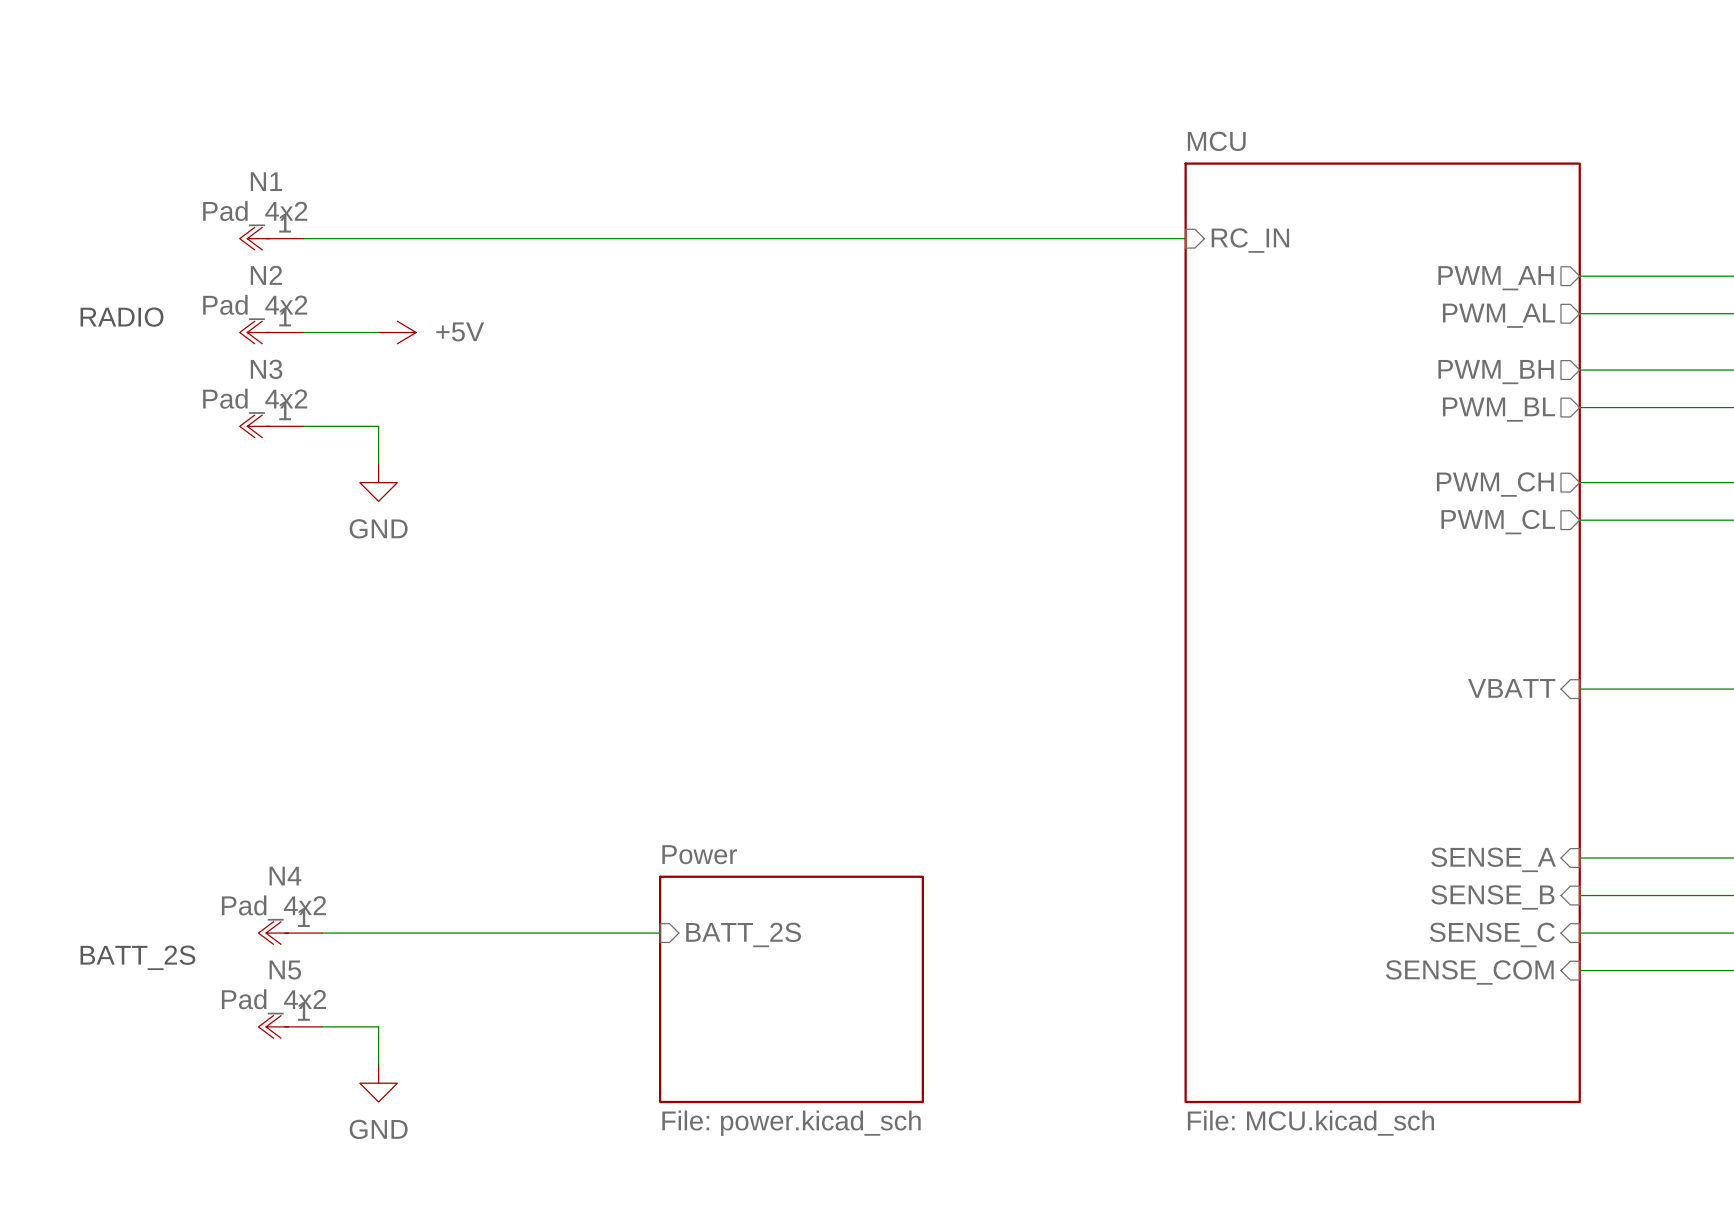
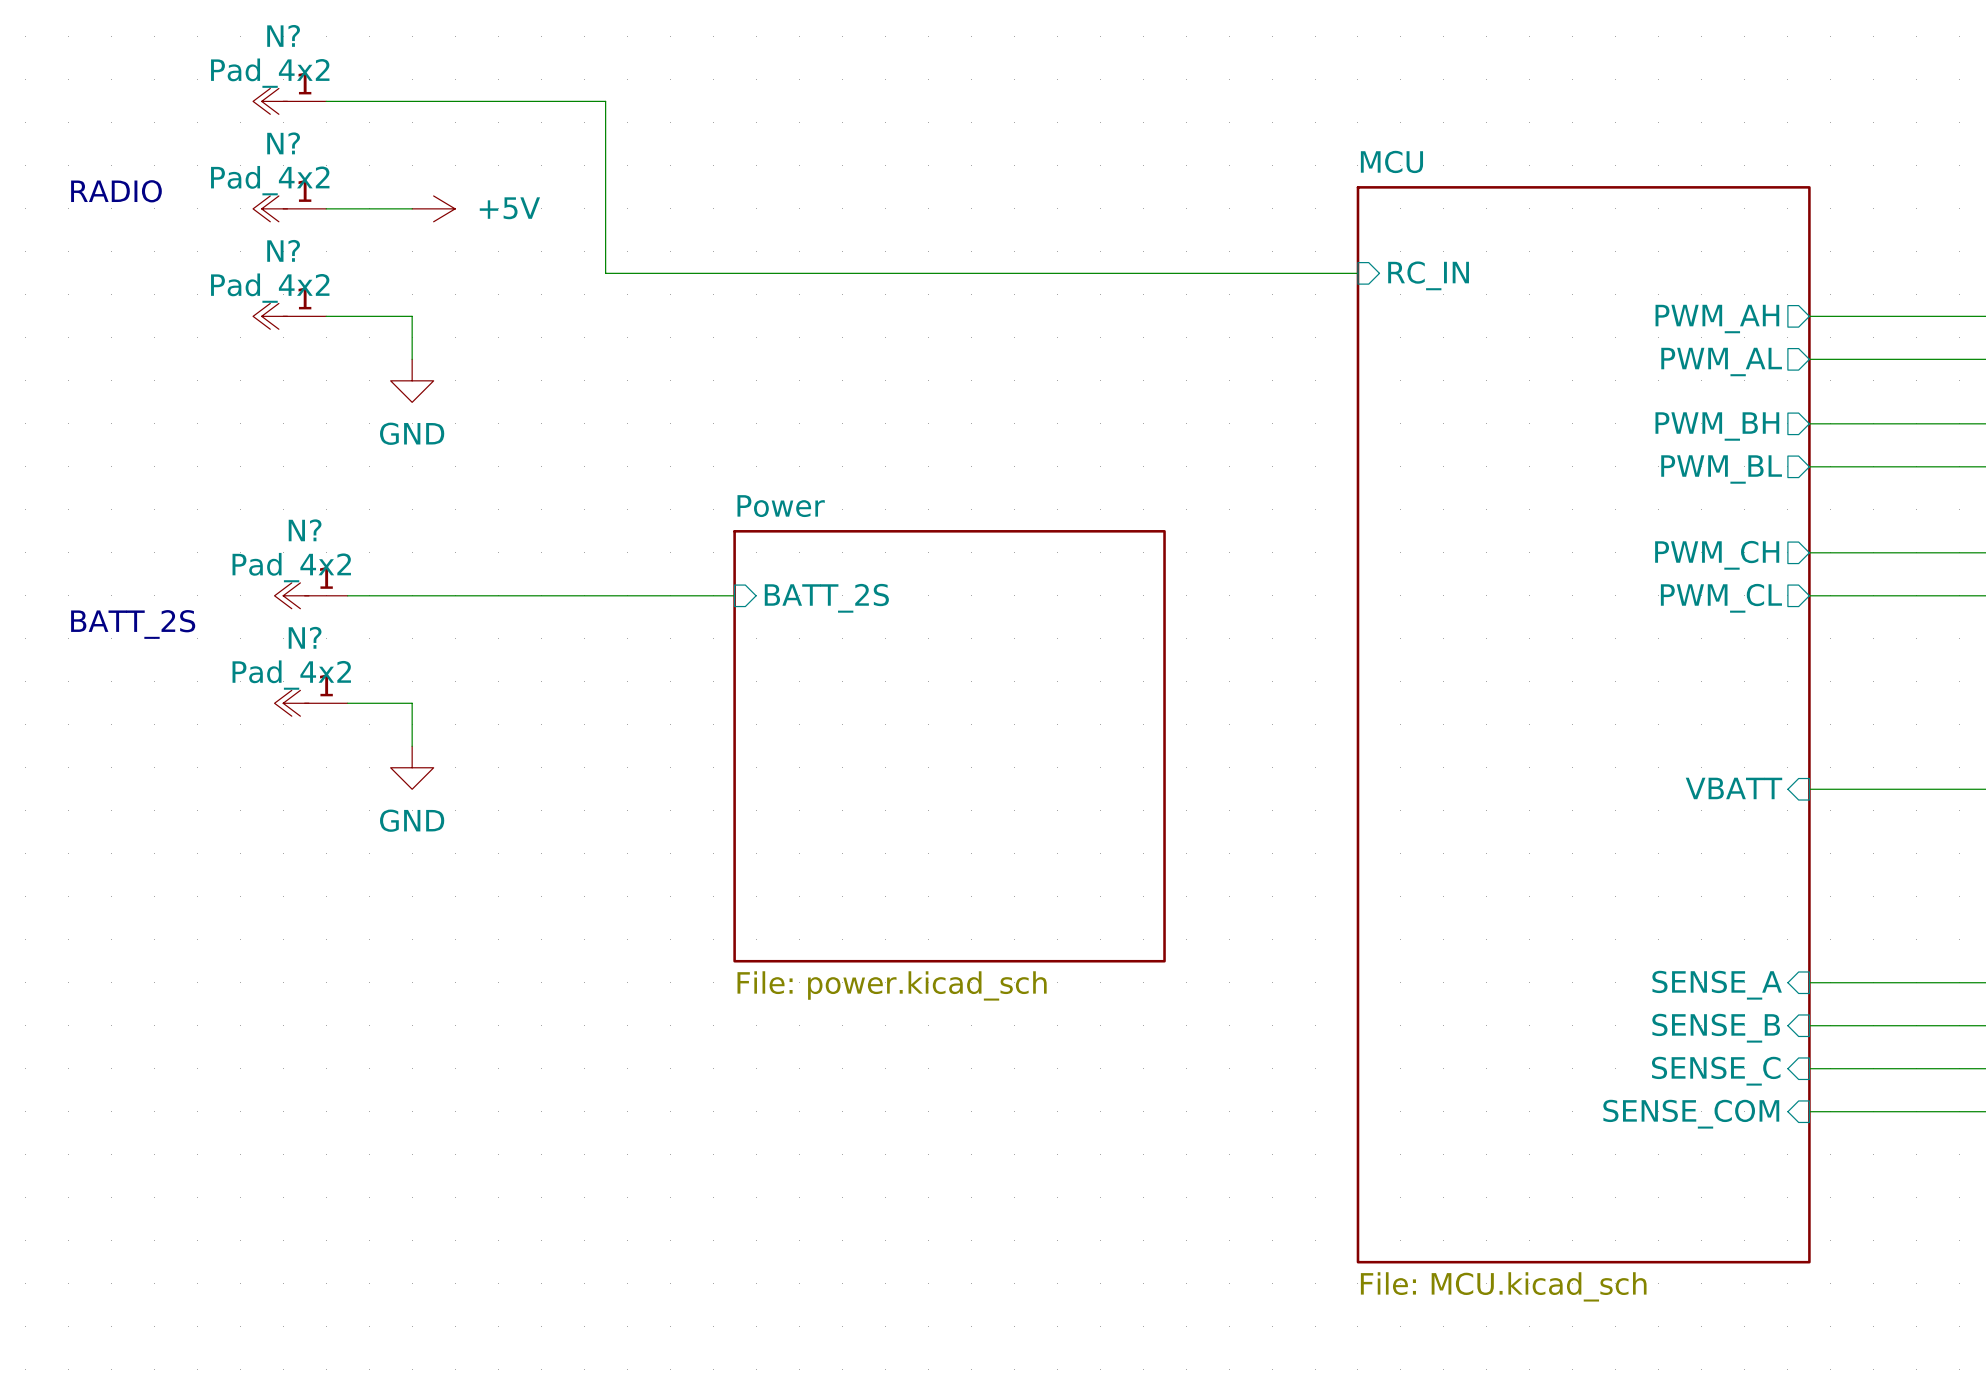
N?: none -> Pad_4x2 (289, 101)
N?: none -> Pad_4x2 (289, 208)
N1: Pad_4x2 (271, 238) -> none
wire: (303, 238) (528, 238) -> (326, 101) (605, 101) (605, 273)
N?: none -> Pad_4x2 (289, 316)
text position: RADIO (121, 317) -> RADIO (116, 191)
N2: Pad_4x2 (271, 332) -> none
wire: (303, 332) (378, 332) -> (326, 208) (412, 208)
power symbol: none -> GND (412, 380)
power symbol position: +5V (397, 332) -> +5V (433, 208)
N3: Pad_4x2 (271, 426) -> none
wire: (303, 426) (378, 426) (378, 463) -> (326, 316) (412, 316) (412, 359)
power symbol: GND (378, 482) -> none
N?: none -> Pad_4x2 (311, 595)
wire: none -> (347, 595) (734, 595)
sheet pin: none -> BATT_2S (826, 598)
text: none -> BATT_2S (133, 624)
N?: none -> Pad_4x2 (311, 703)
wire: none -> (347, 703) (412, 703) (412, 746)
sheet Power: none -> File: power.kicad_sch (949, 746)
power symbol: none -> GND (412, 767)
N4: Pad_4x2 (290, 933) -> none
wire: (322, 933) (660, 933) -> none
sheet pin: BATT_2S (743, 934) -> none
text: BATT_2S (137, 957) -> none
sheet Power: File: power.kicad_sch (791, 989) -> none
N5: Pad_4x2 (290, 1026) -> none
wire: (322, 1026) (378, 1026) (378, 1064) -> none
power symbol: GND (378, 1083) -> none

